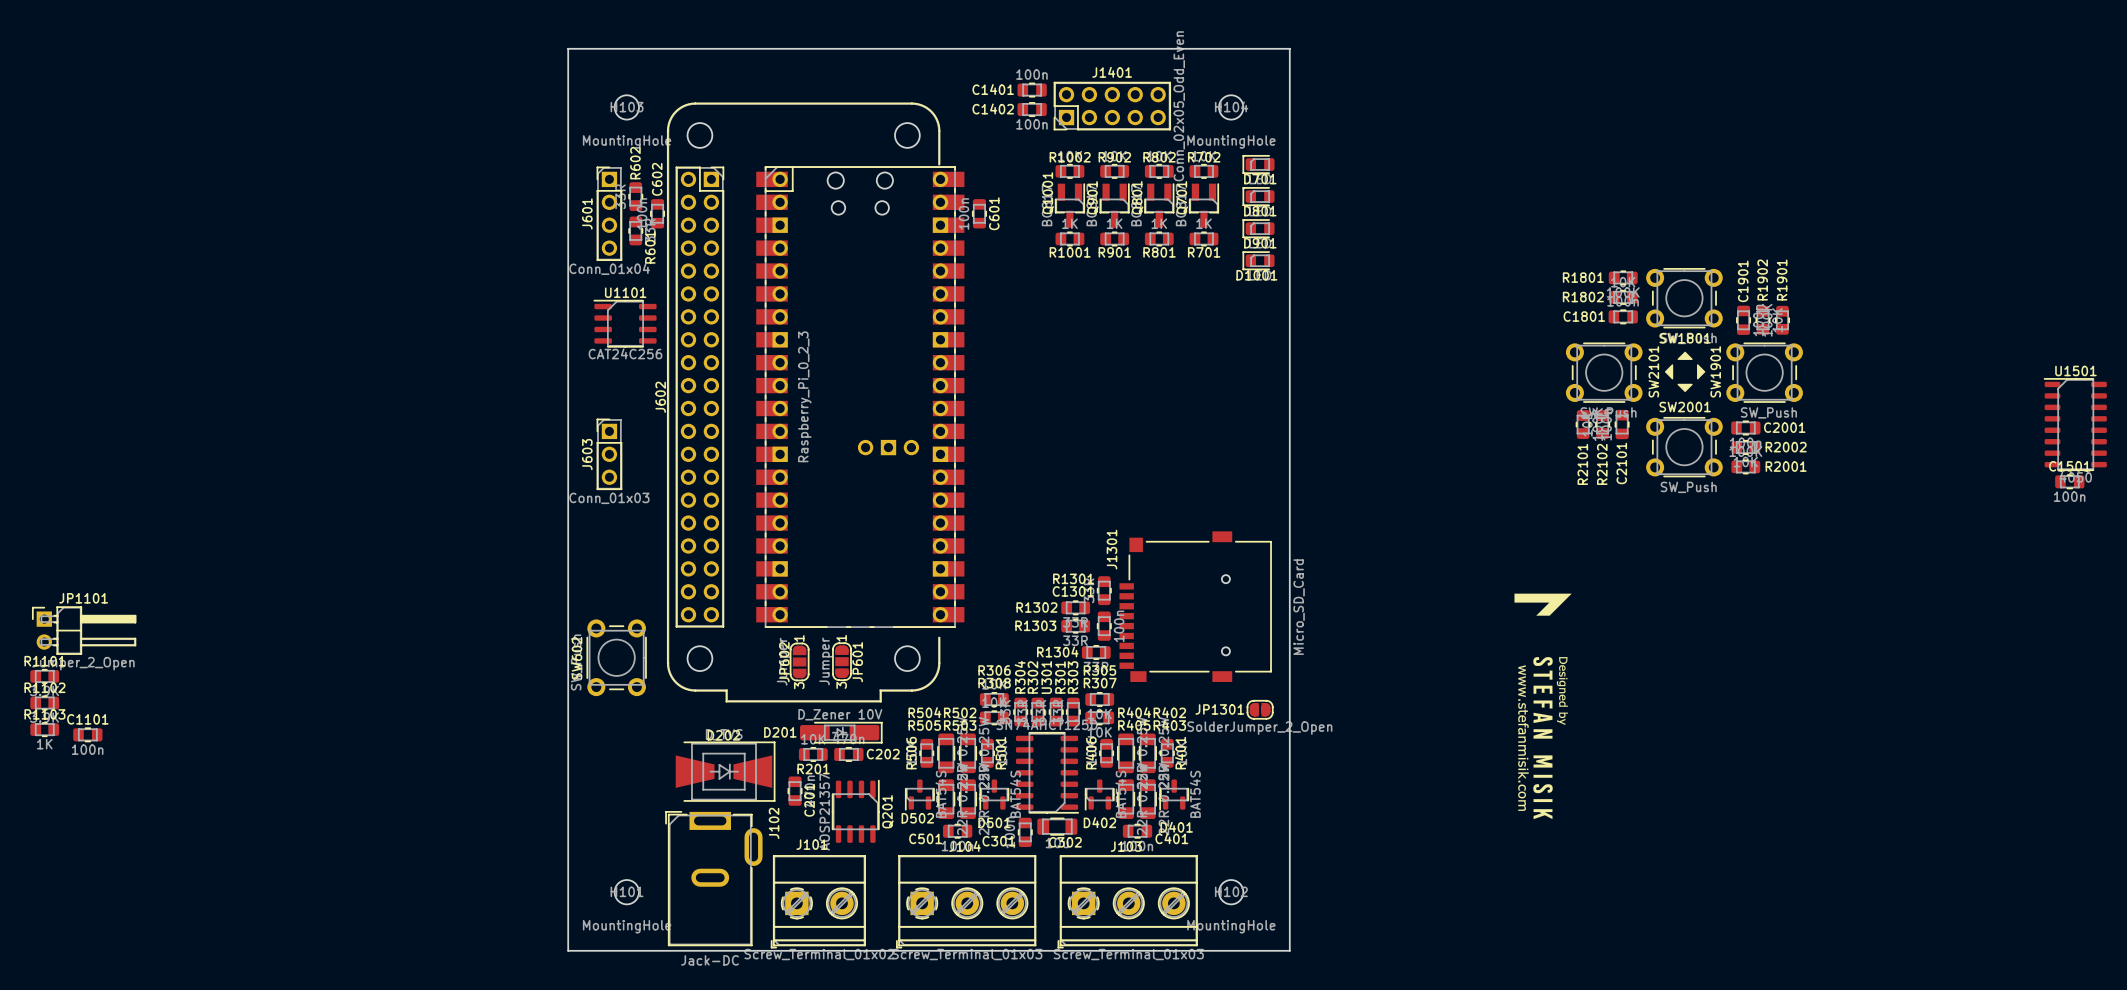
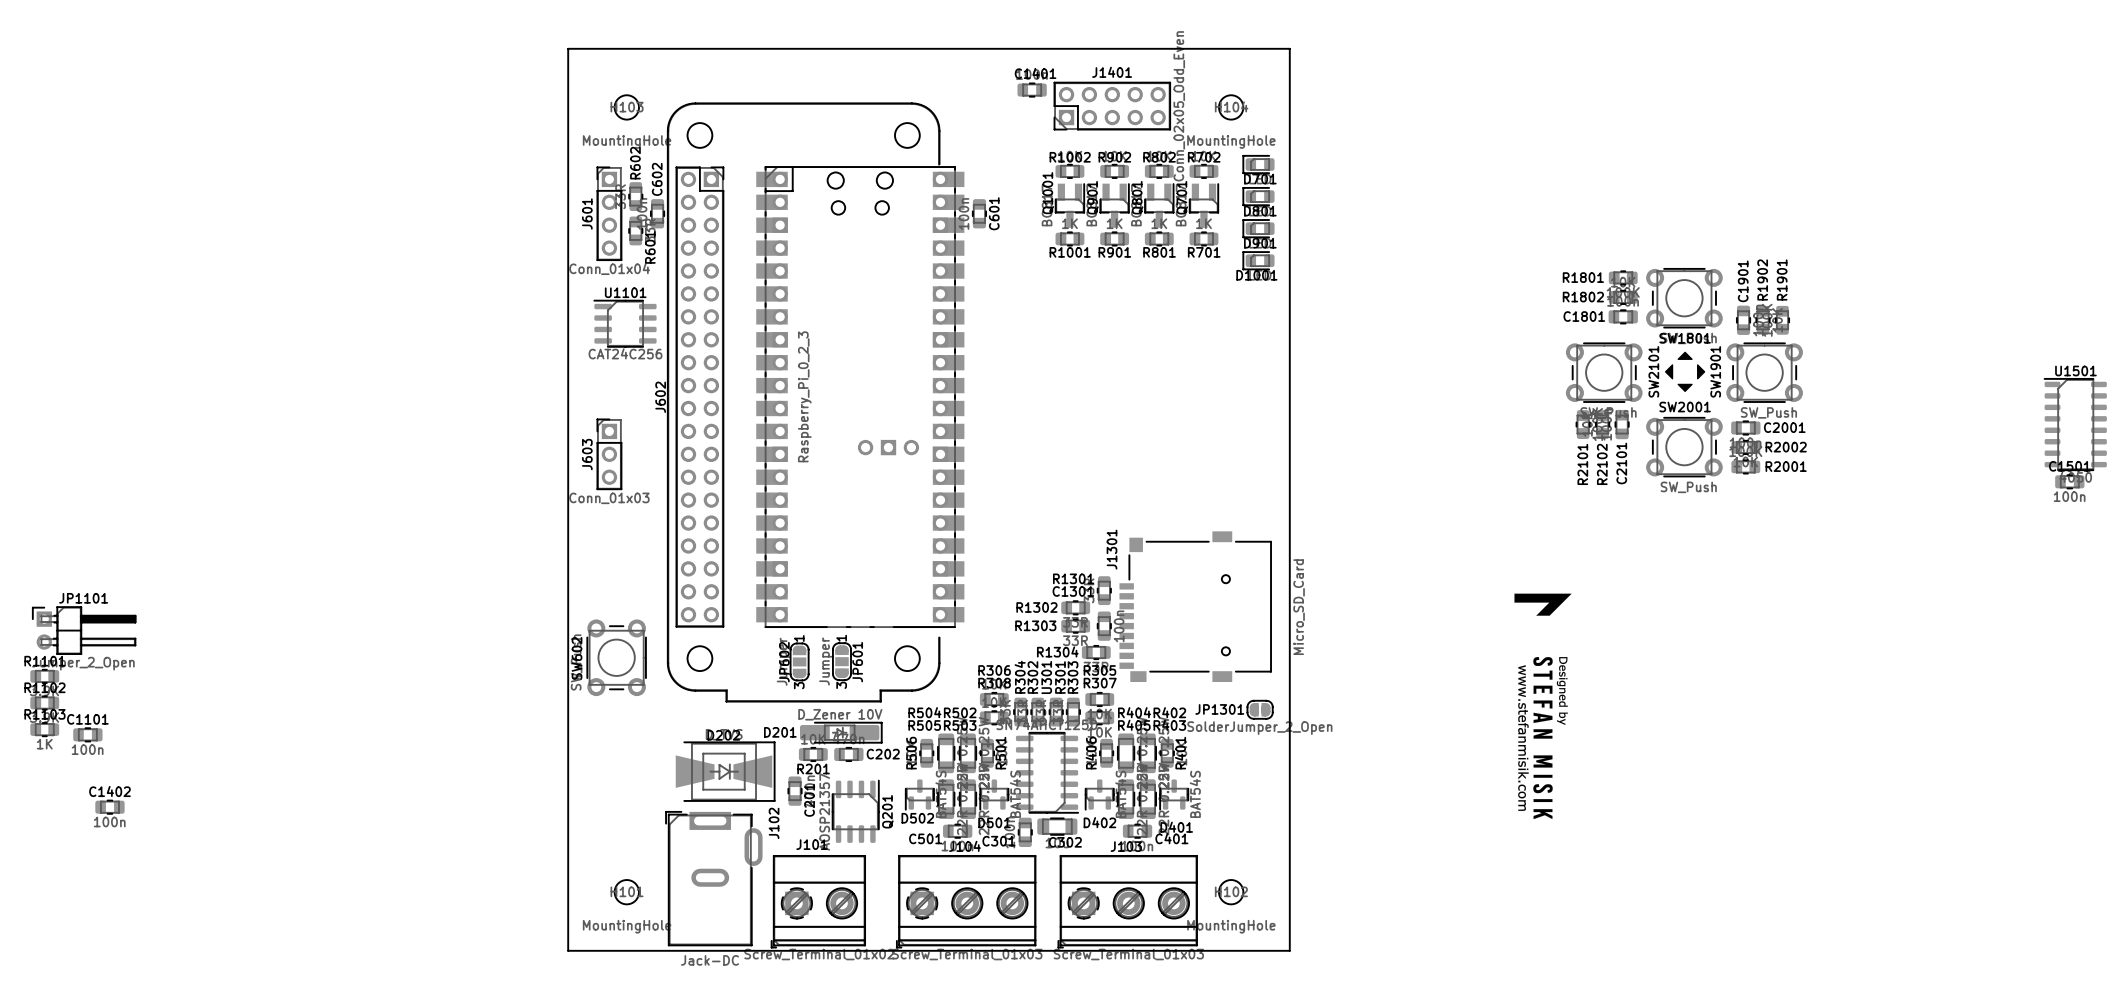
C1401 name position: C1401 (993, 89) -> C1401 (1035, 73)
C1402 name position: C1402 (993, 108) -> C1402 (109, 791)
C1402 position: (1032, 109) -> (109, 807)

